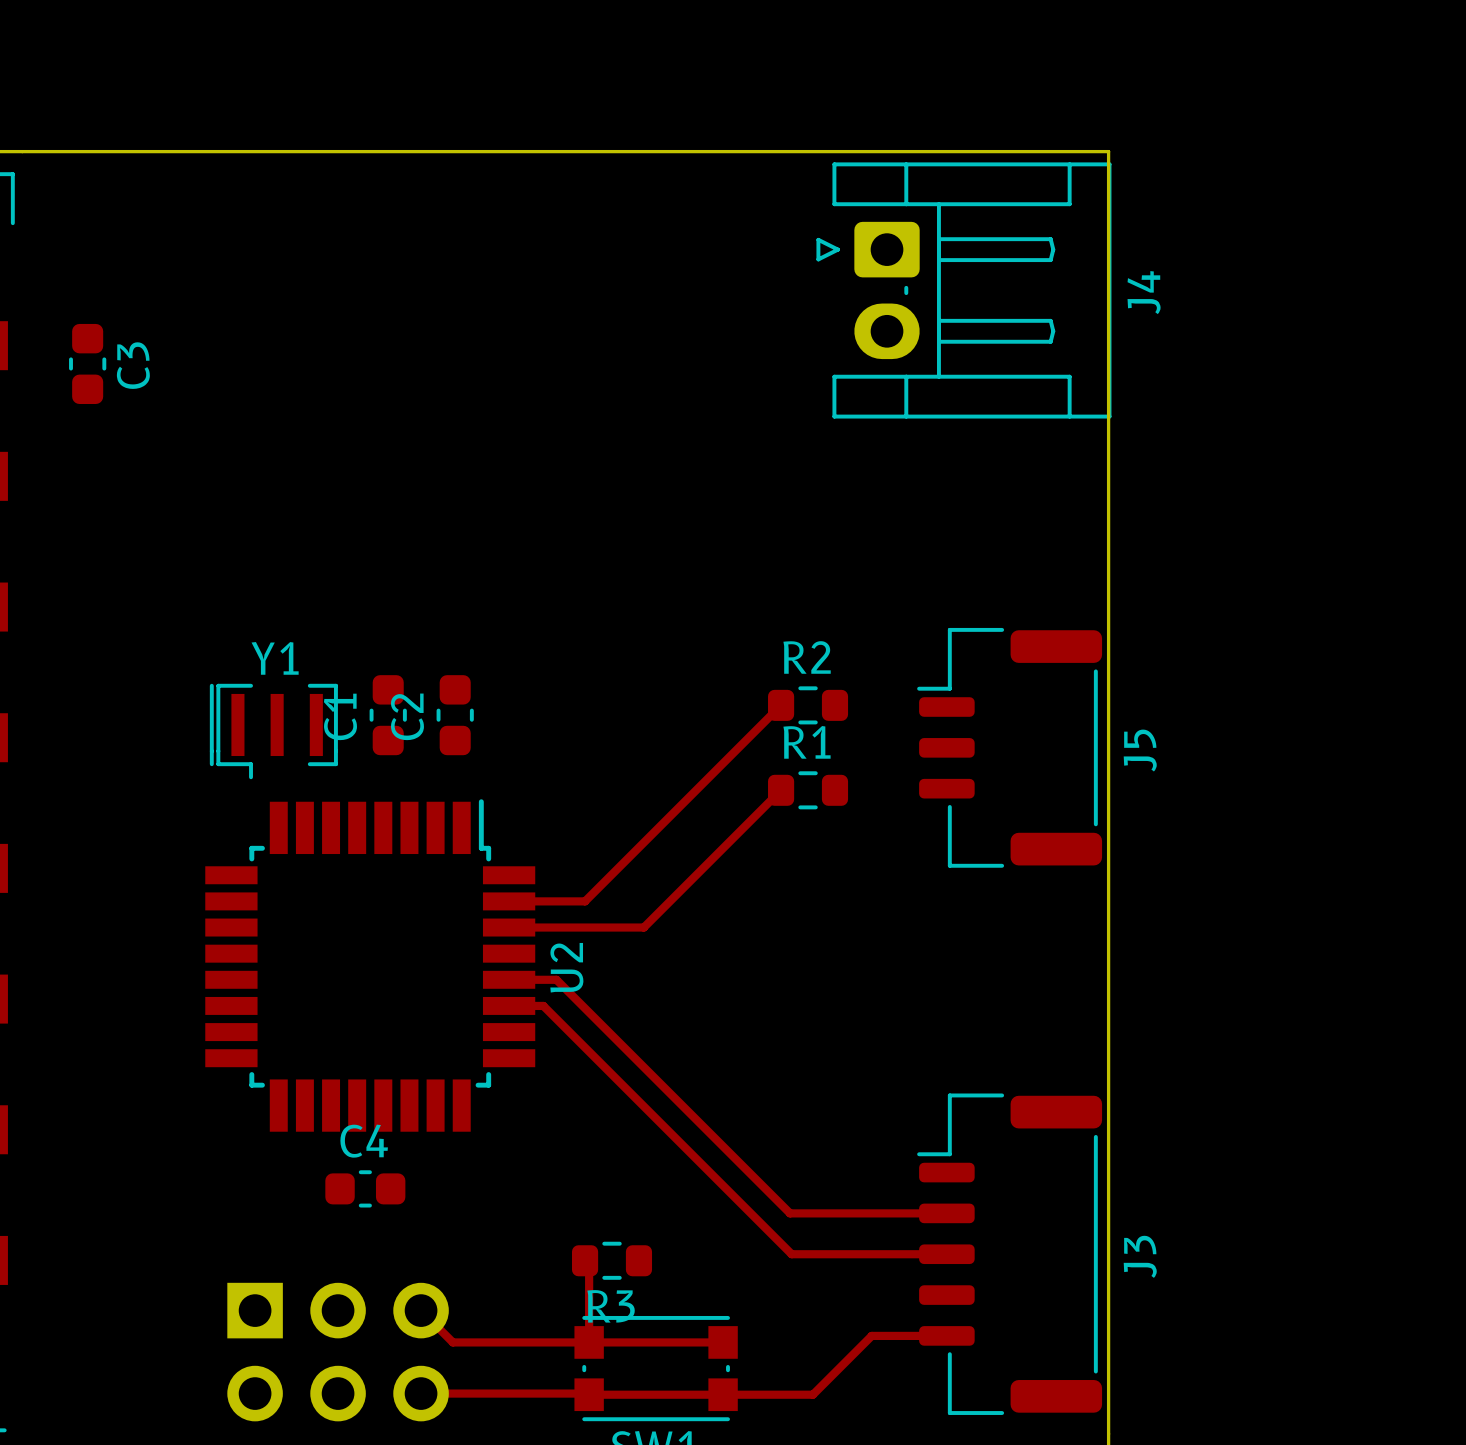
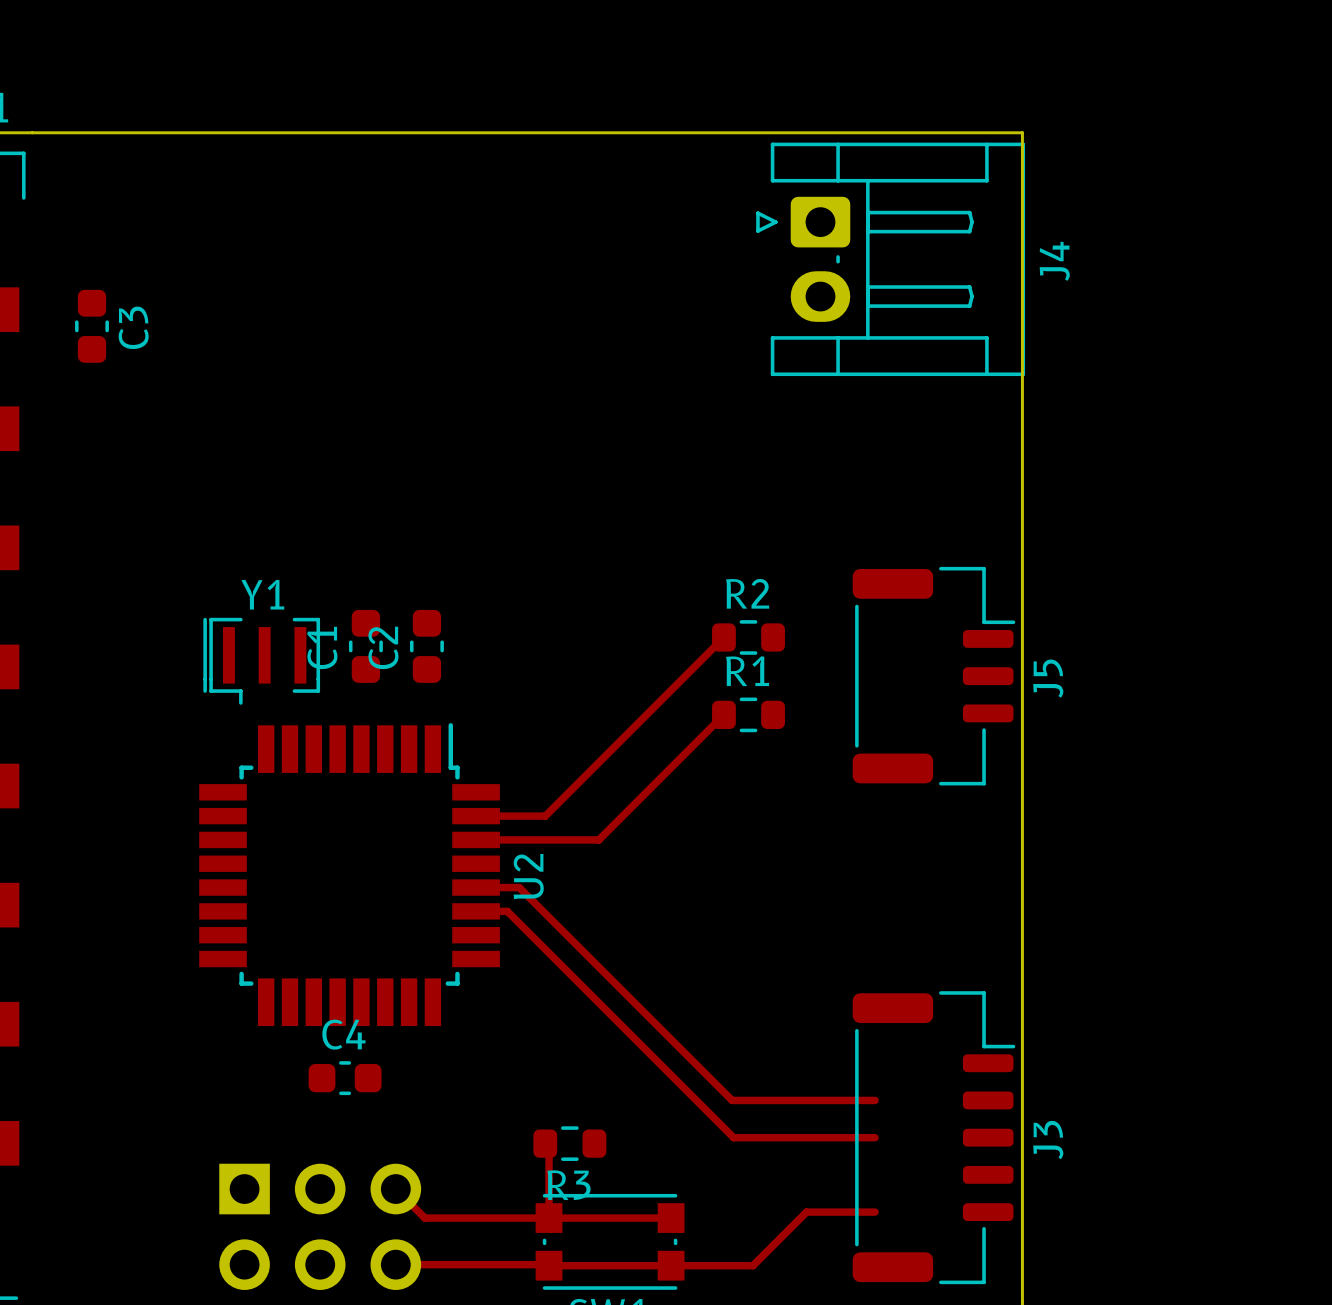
J5 footprint: [917, 627, 1103, 868] -> [852, 566, 1016, 786]
J3 footprint: [917, 1093, 1103, 1415] -> [852, 991, 1016, 1285]

